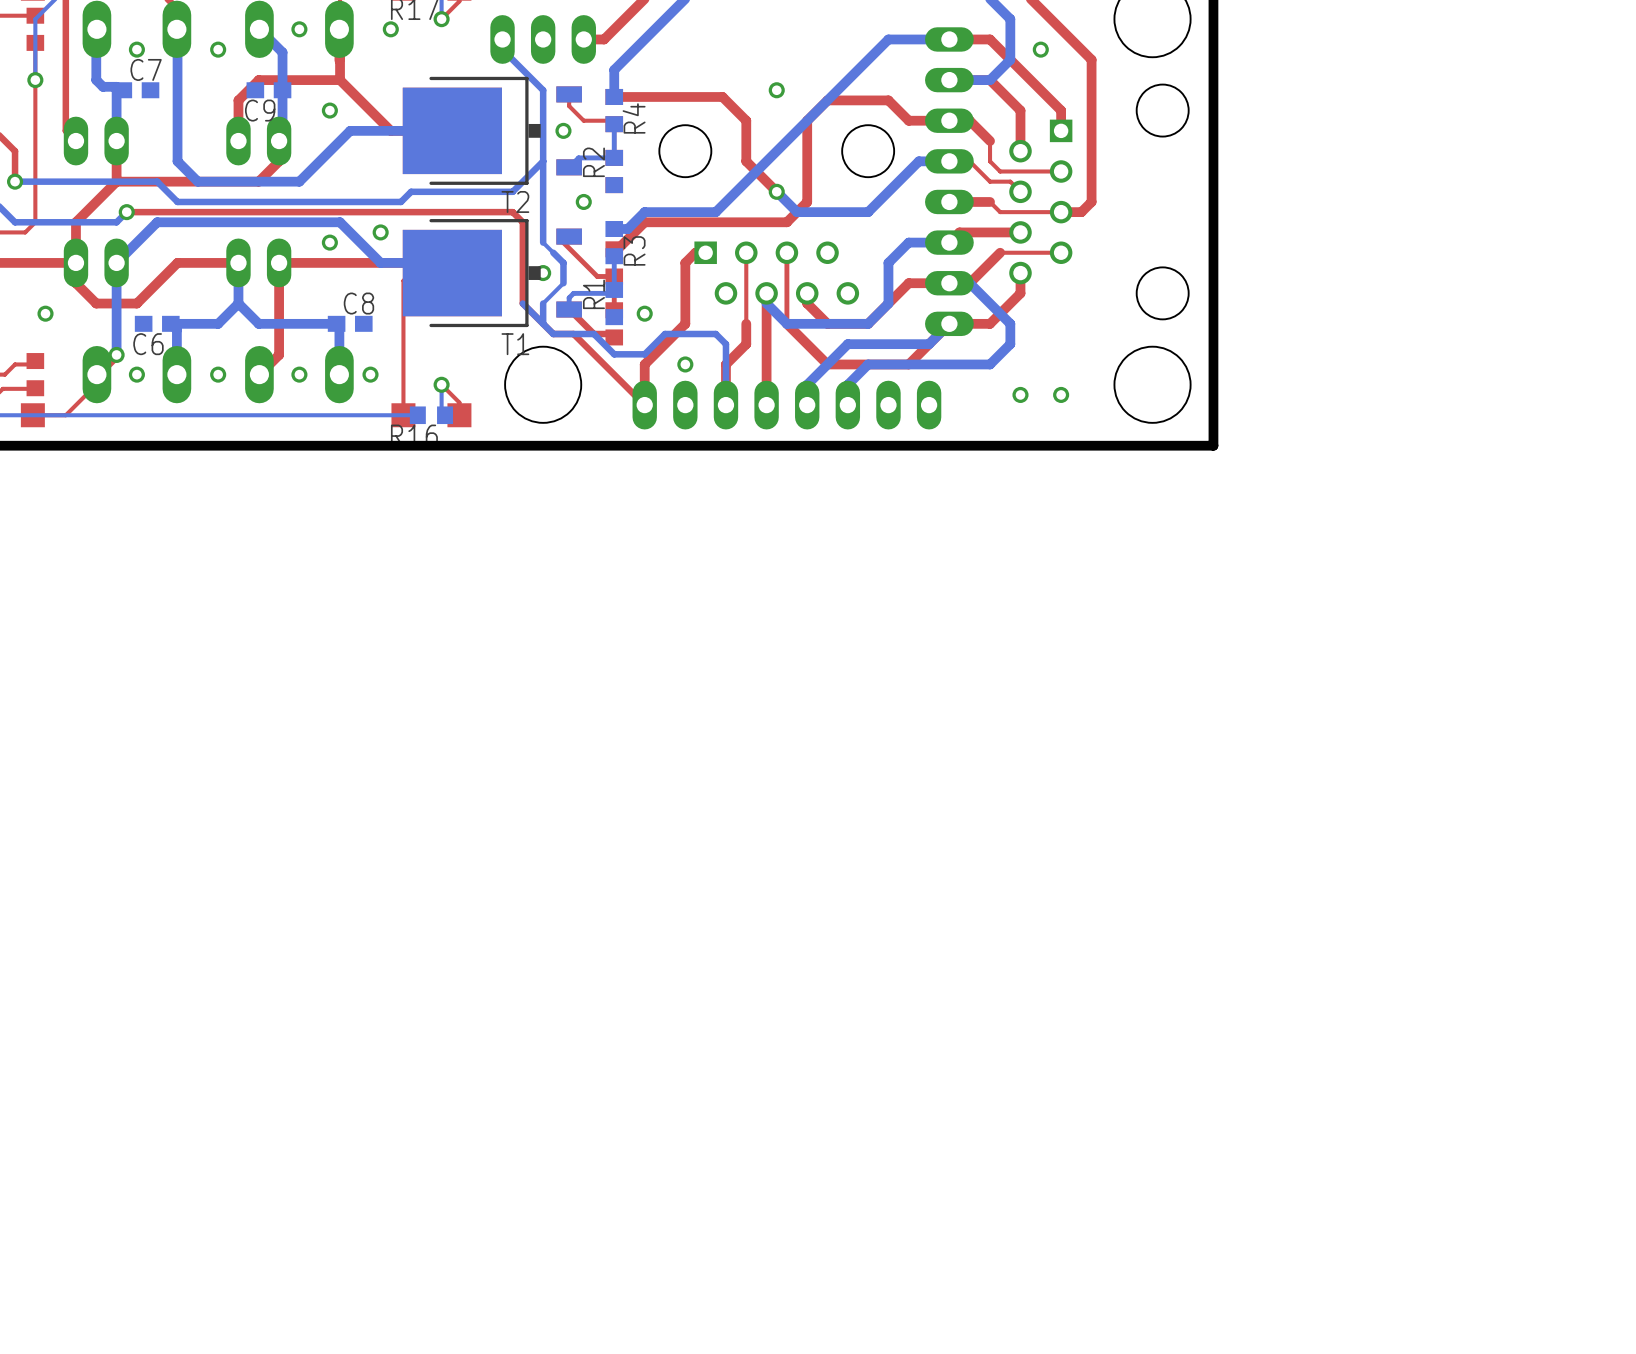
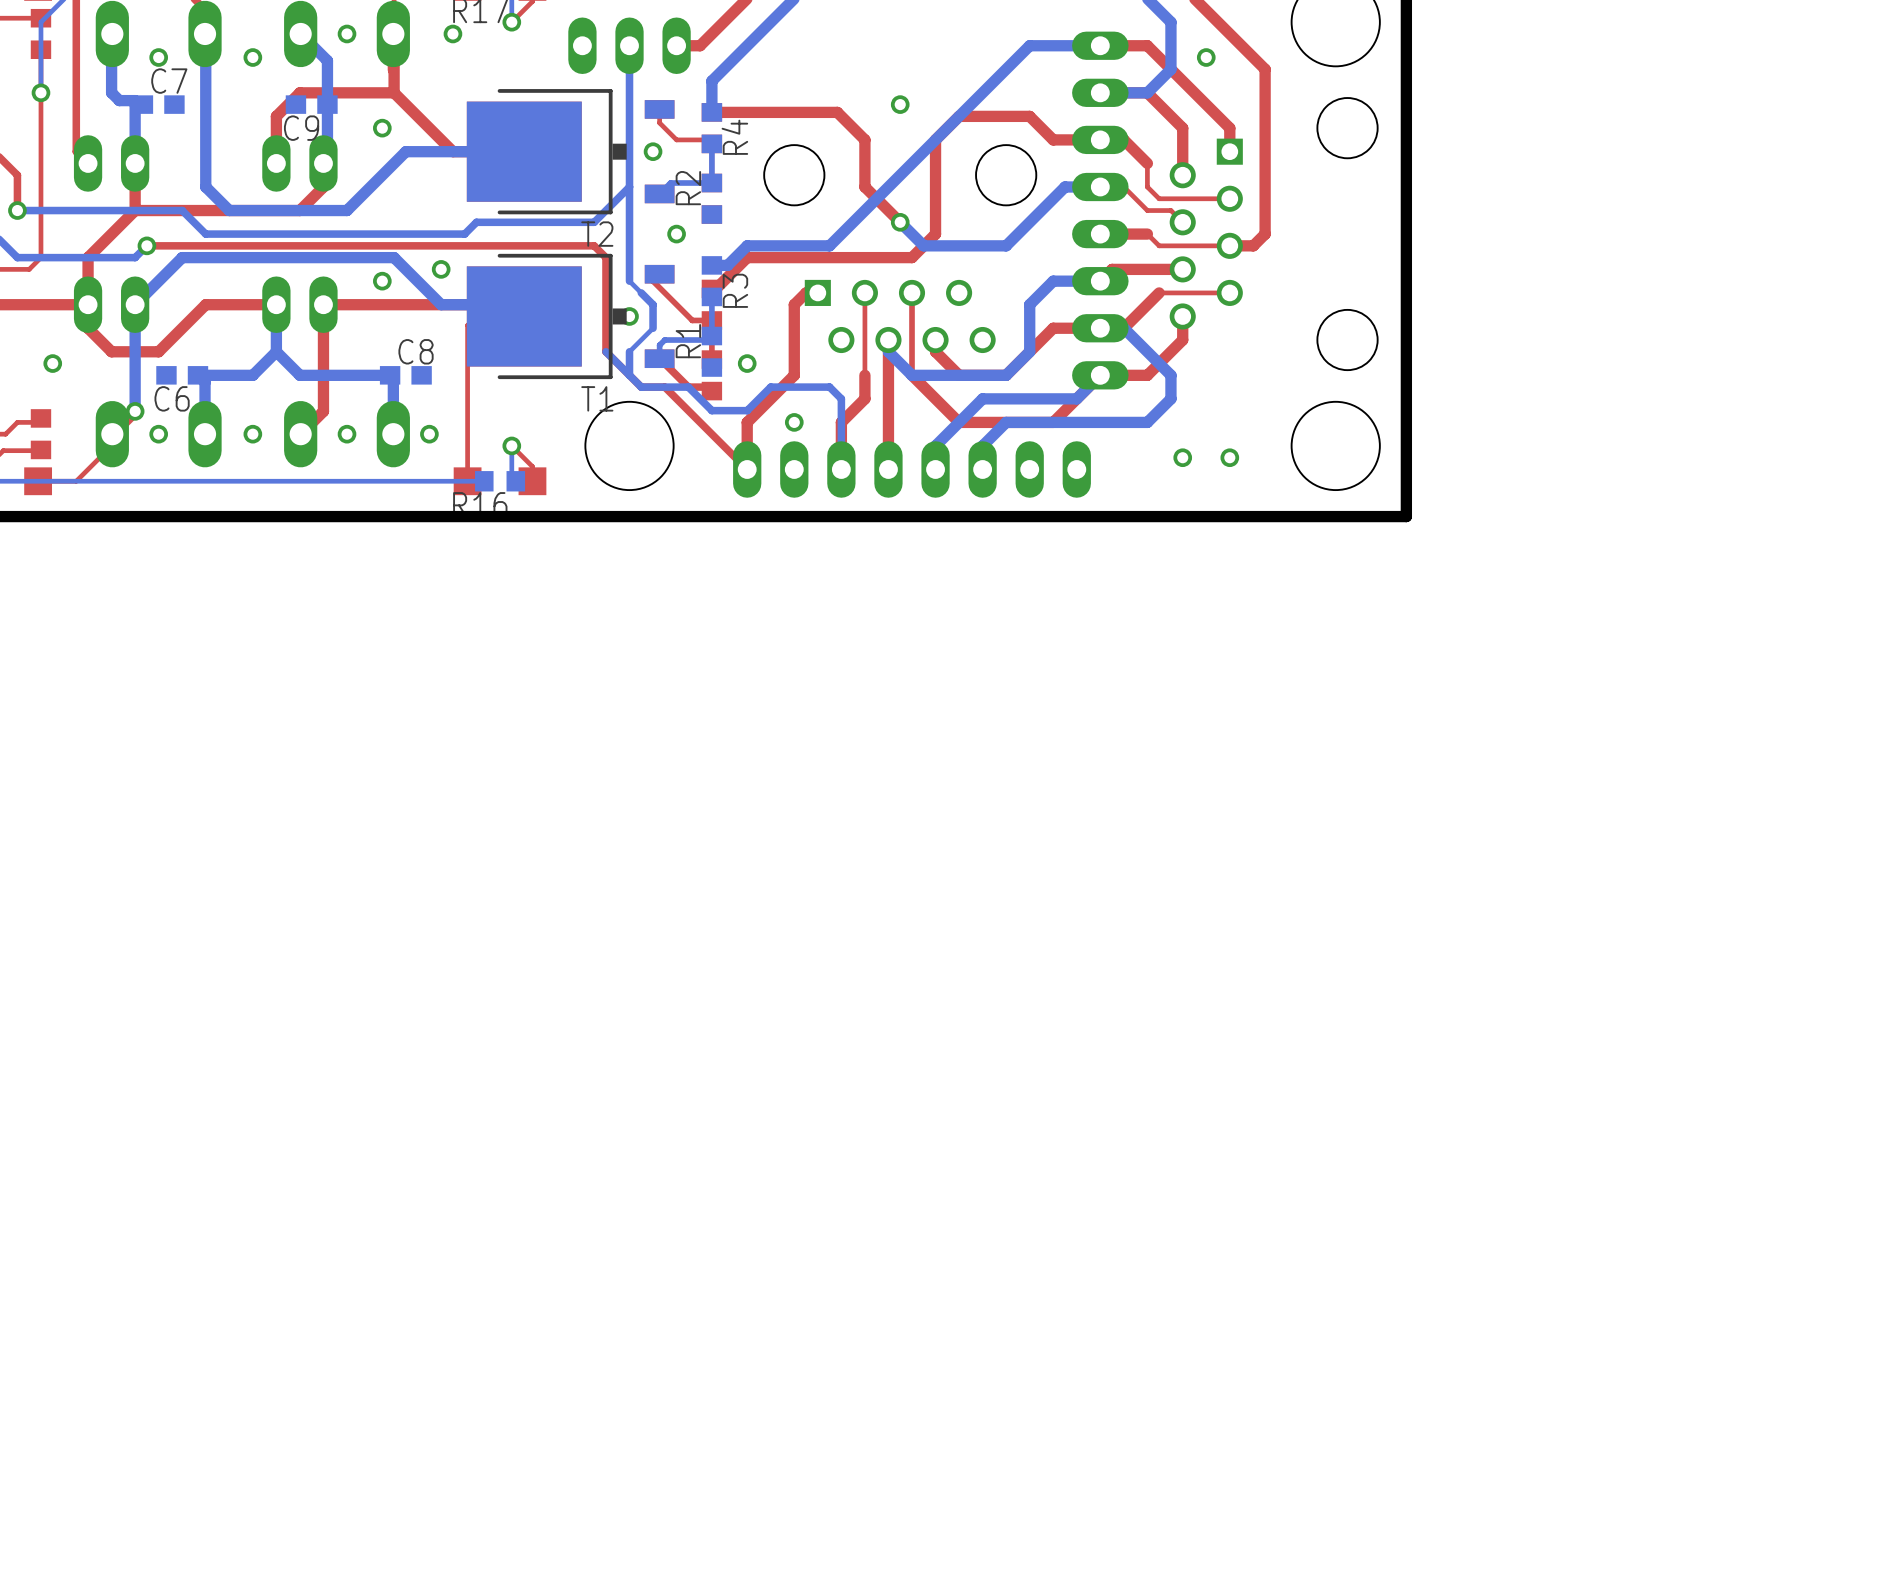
bottom track: (502, 39) (502, 49) (543, 90) -> (629, 45) (629, 104)

